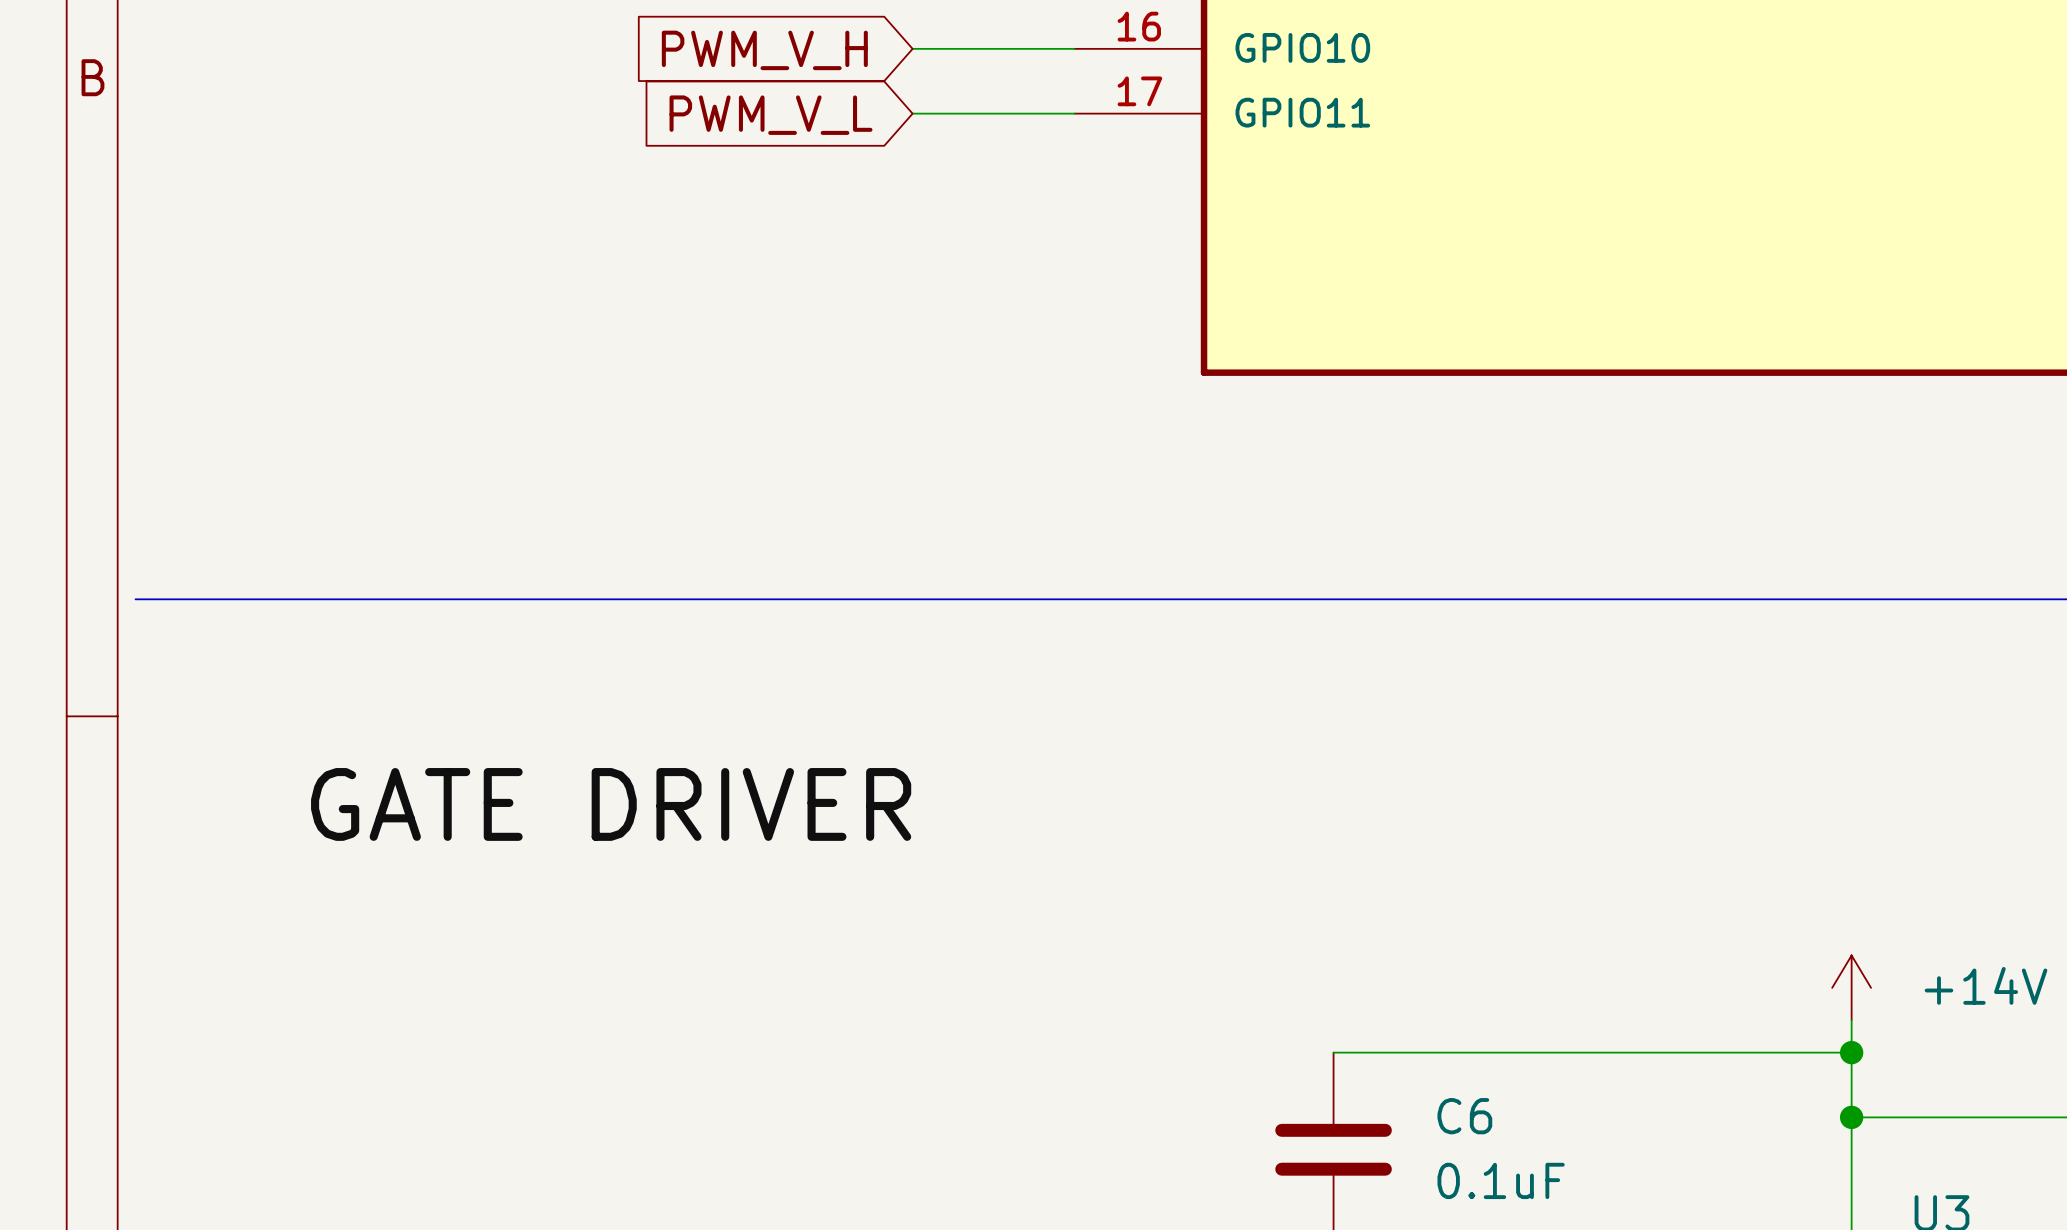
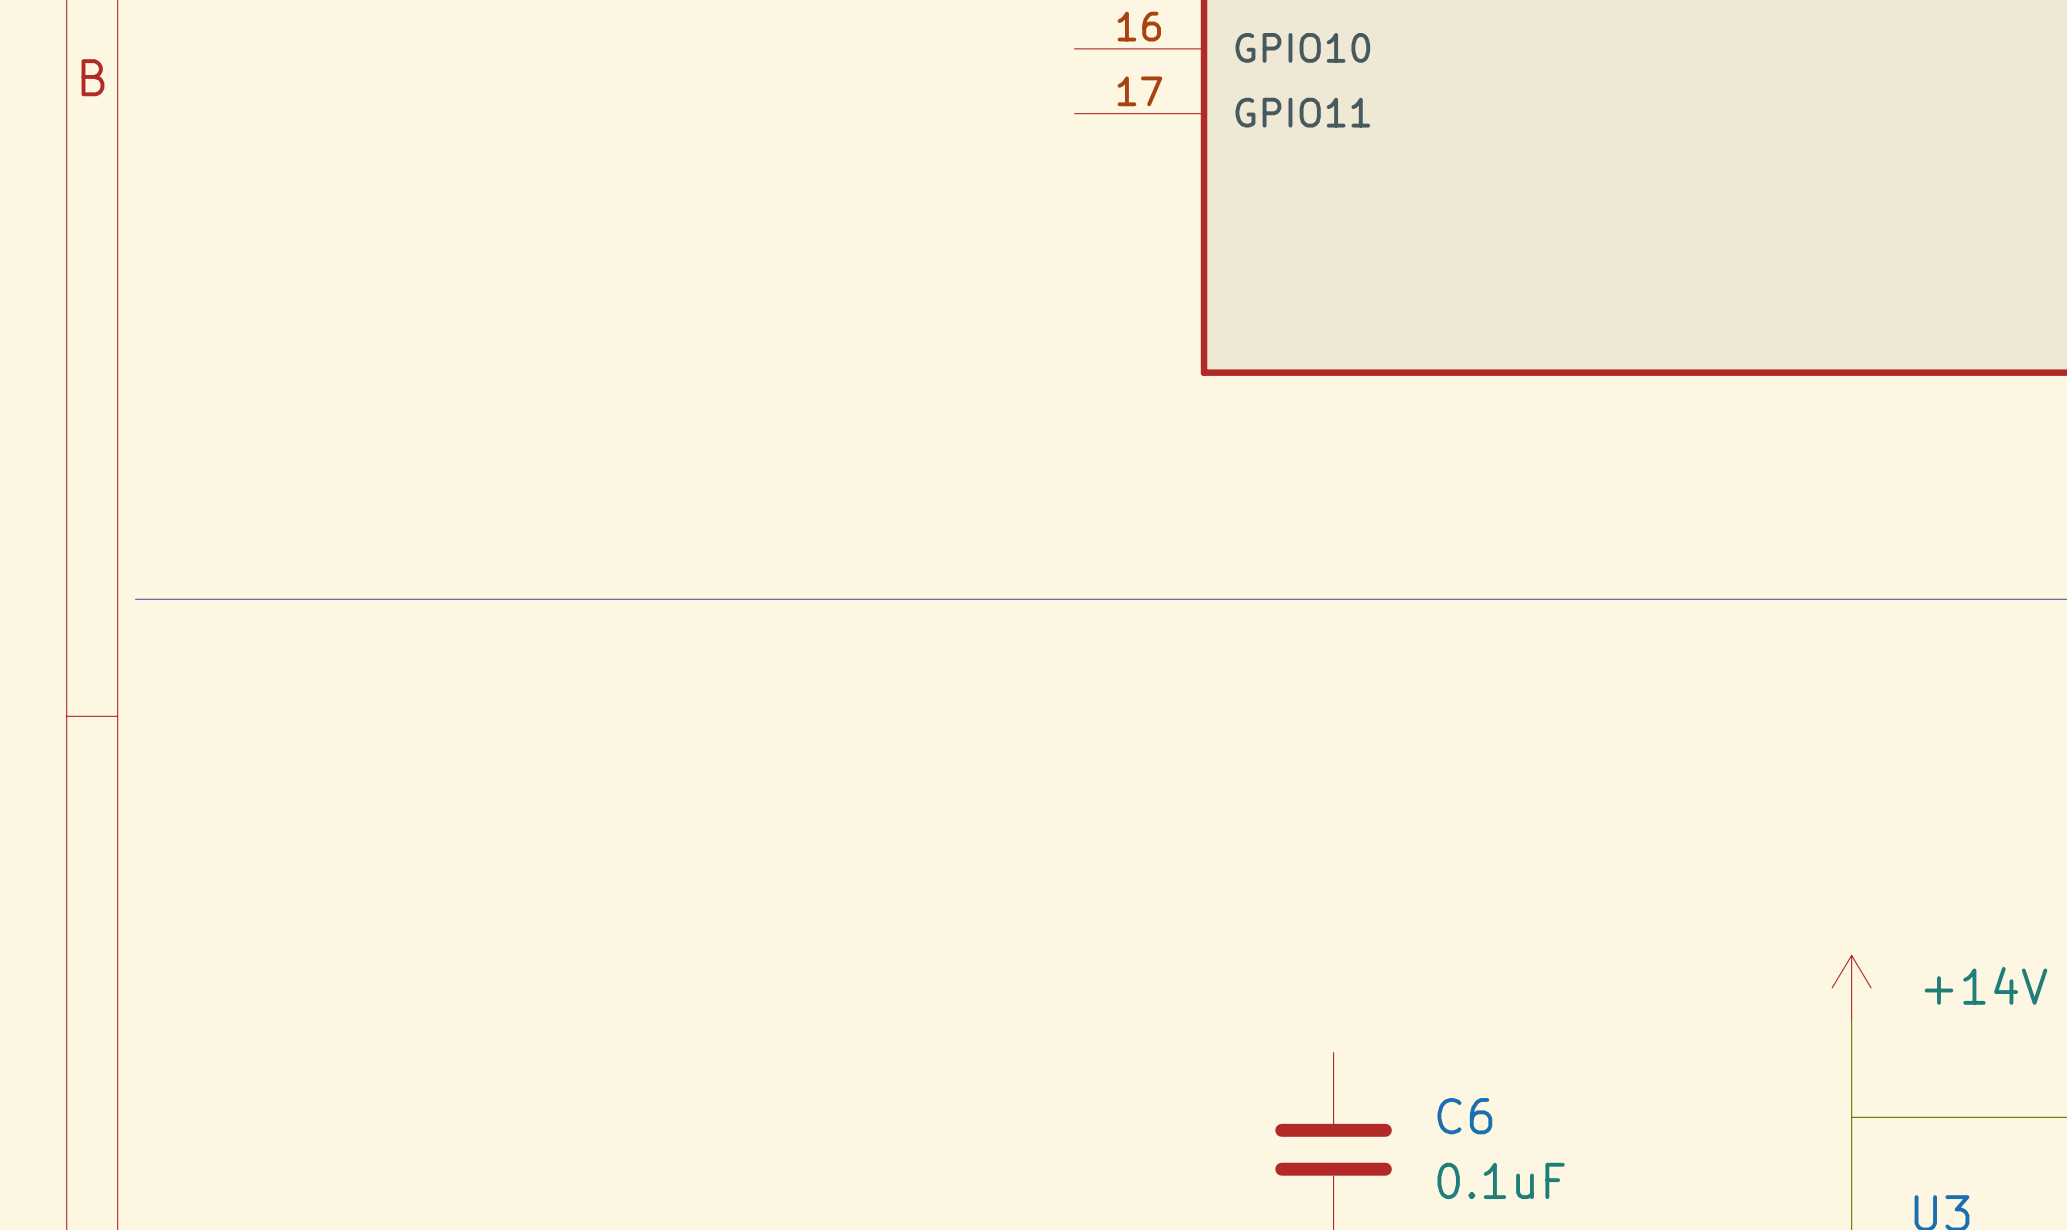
wire: (912, 48) (1074, 48) -> none
global label: PWM_V_H (764, 50) -> none
wire: (912, 113) (1074, 113) -> none
global label: PWM_V_L (771, 115) -> none
label: GATE DRIVER (611, 804) -> none
wire: (1333, 1052) (1851, 1052) -> none
junction: (1851, 1052) -> none
junction: (1851, 1117) -> none

